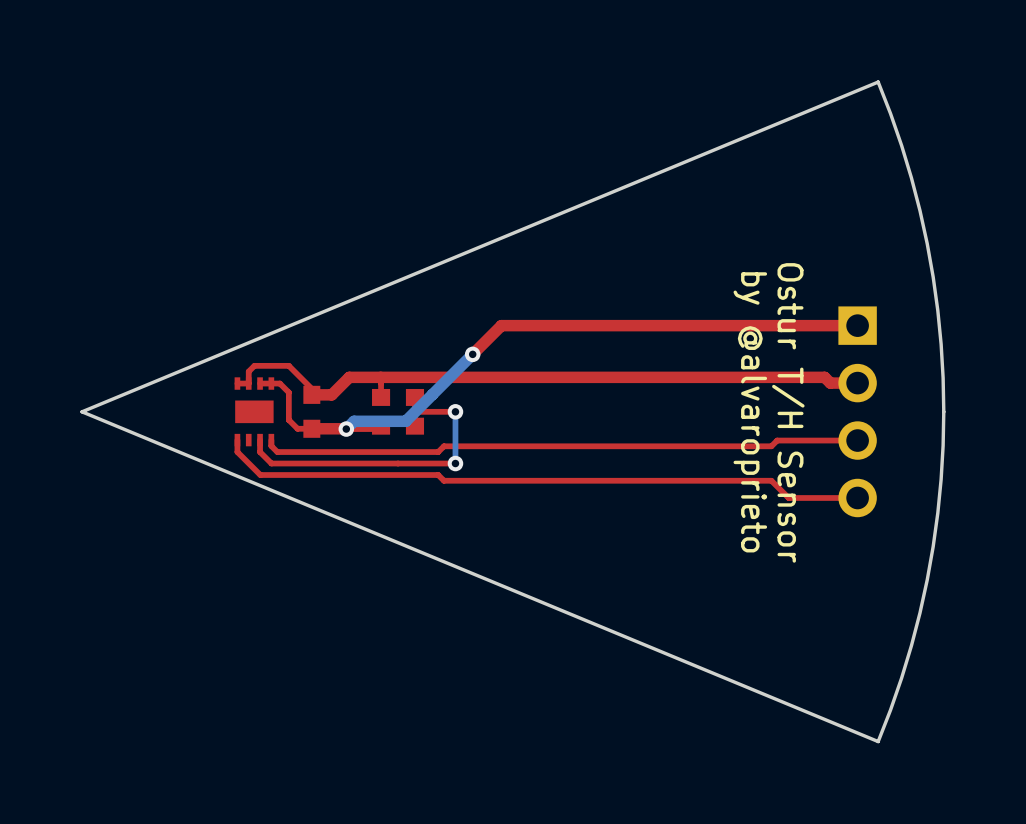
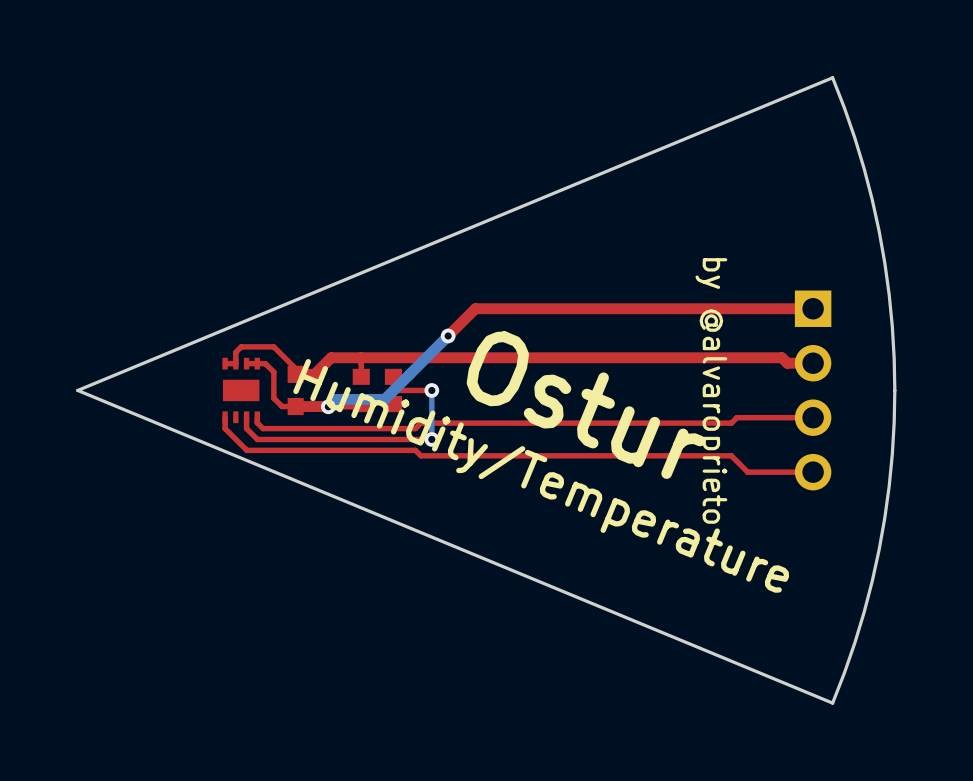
text: Ostur T/H Sensor (788, 412) -> none
text: none -> Ostur (586, 405)
text: none -> Humidity/Temperature (541, 475)

